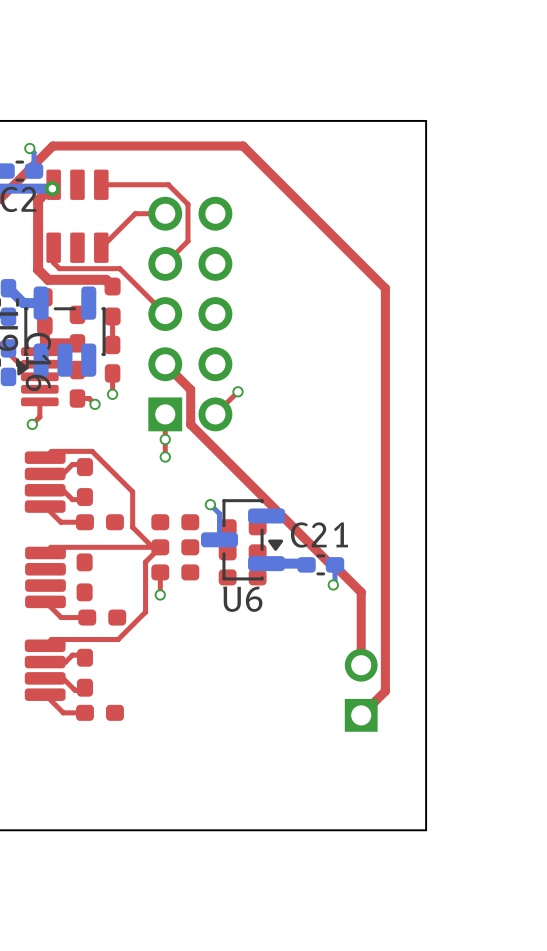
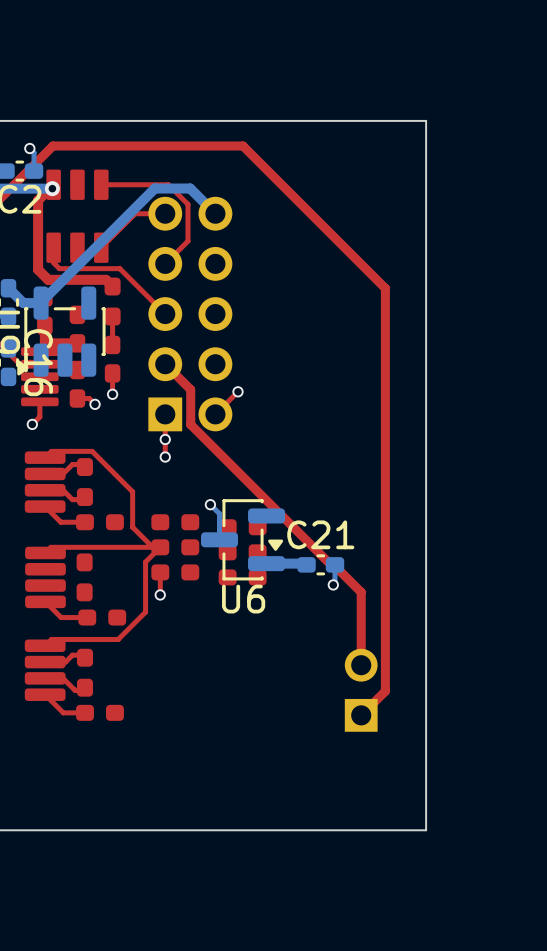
bottom track: none -> (215, 213) (190, 188) (154, 188) (41, 303)

